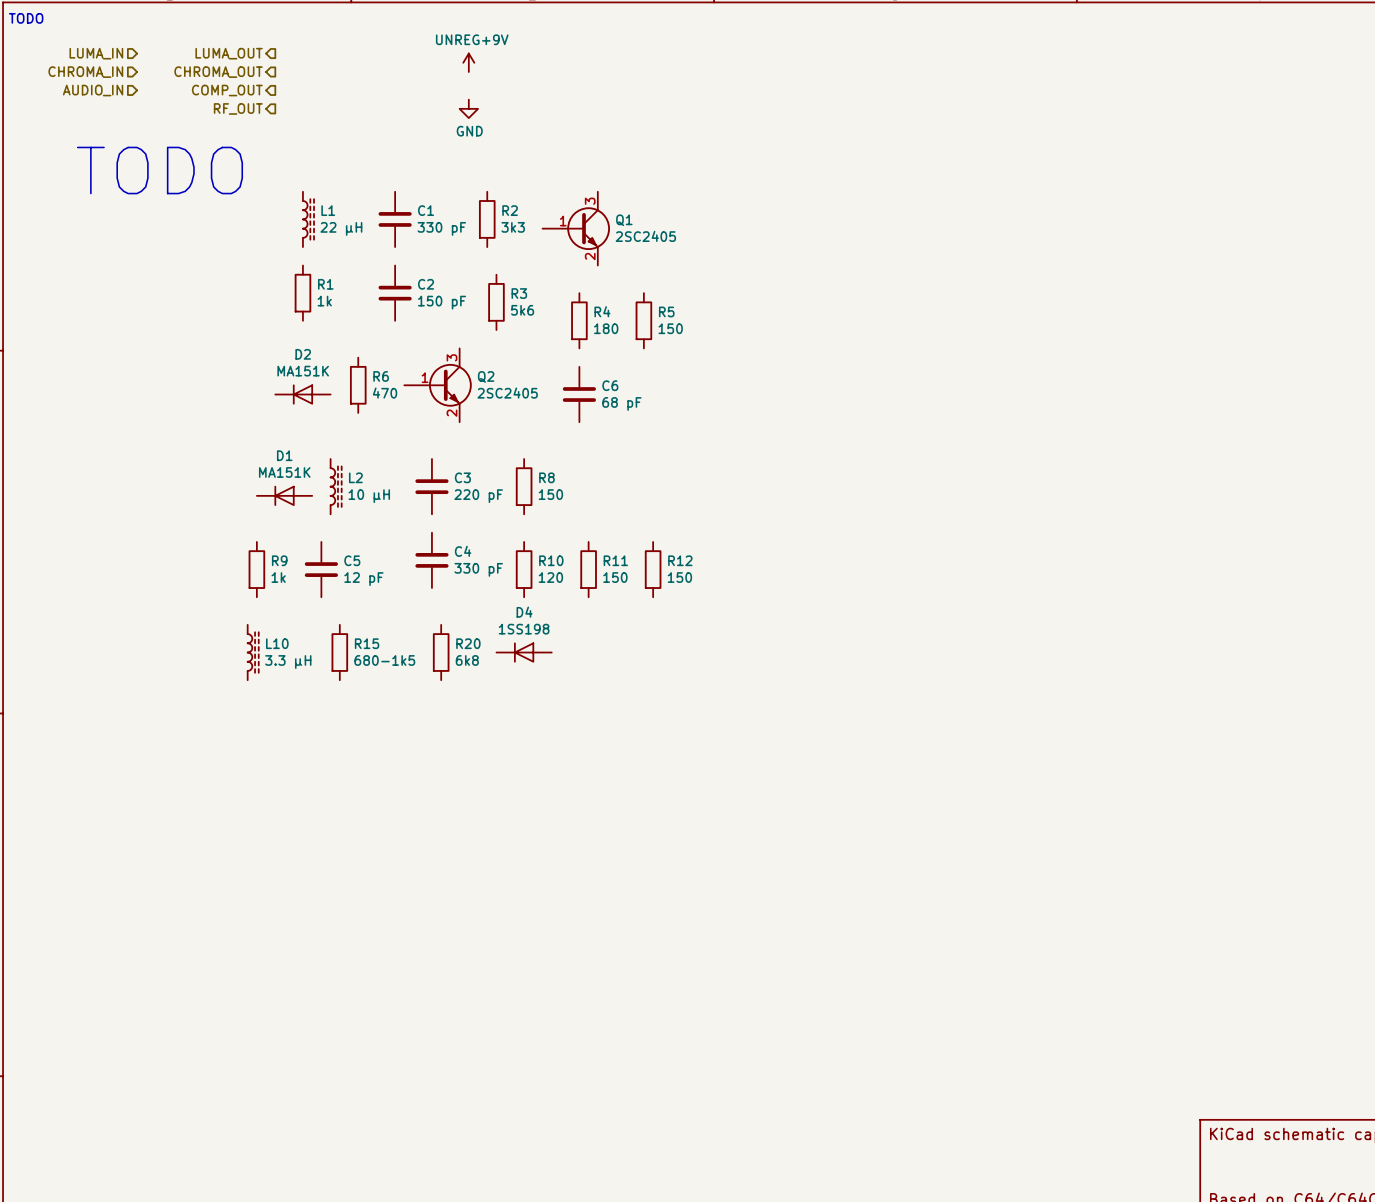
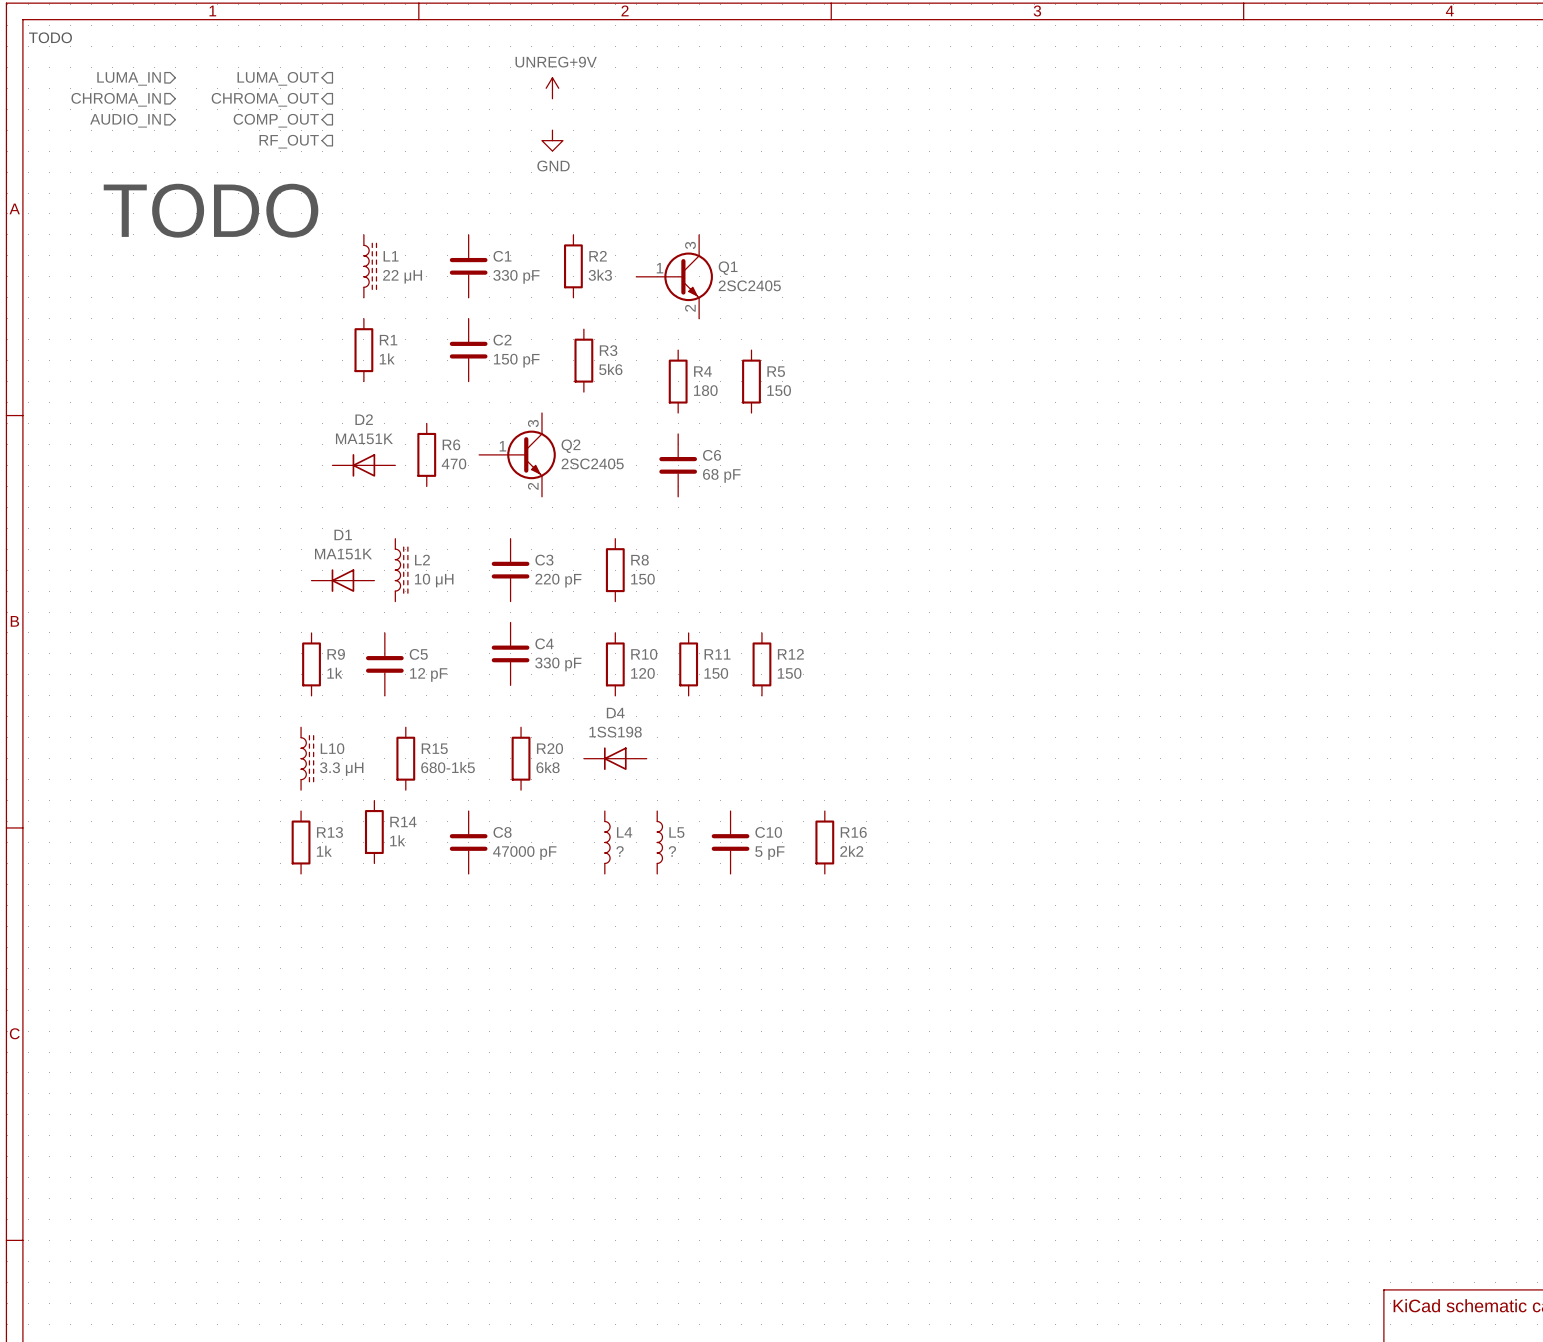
R14: none -> 1k (374, 832)
R13: none -> 1k (301, 842)
C8: none -> 47000 pF (468, 842)
L4: none -> ? (607, 842)
L5: none -> ? (659, 842)
C10: none -> 5 pF (730, 842)
R16: none -> 2k2 (824, 842)

